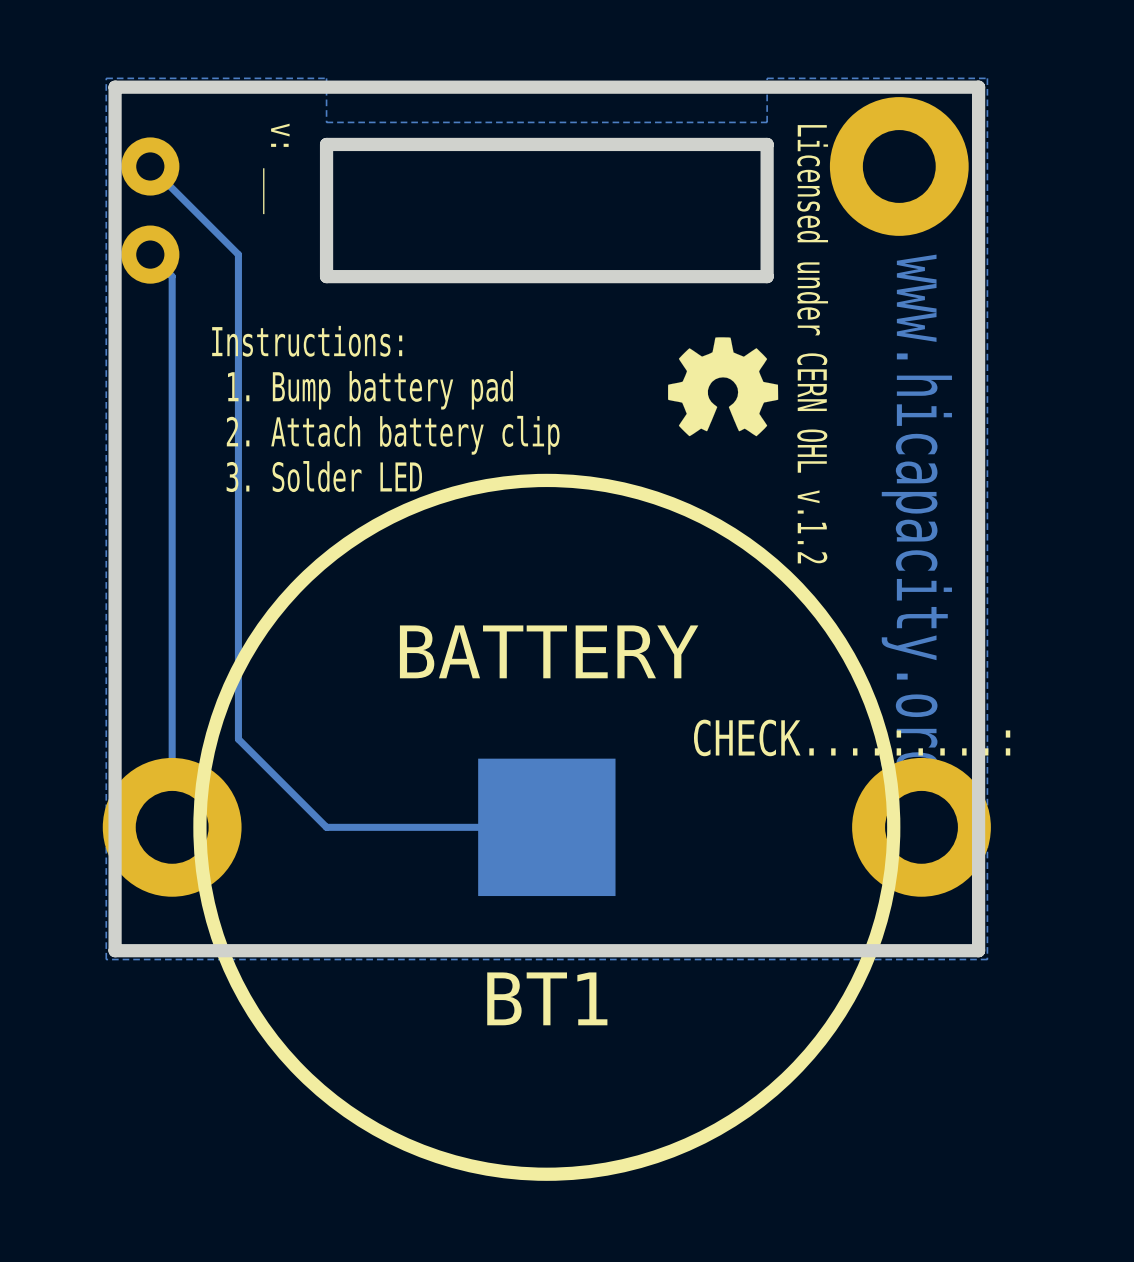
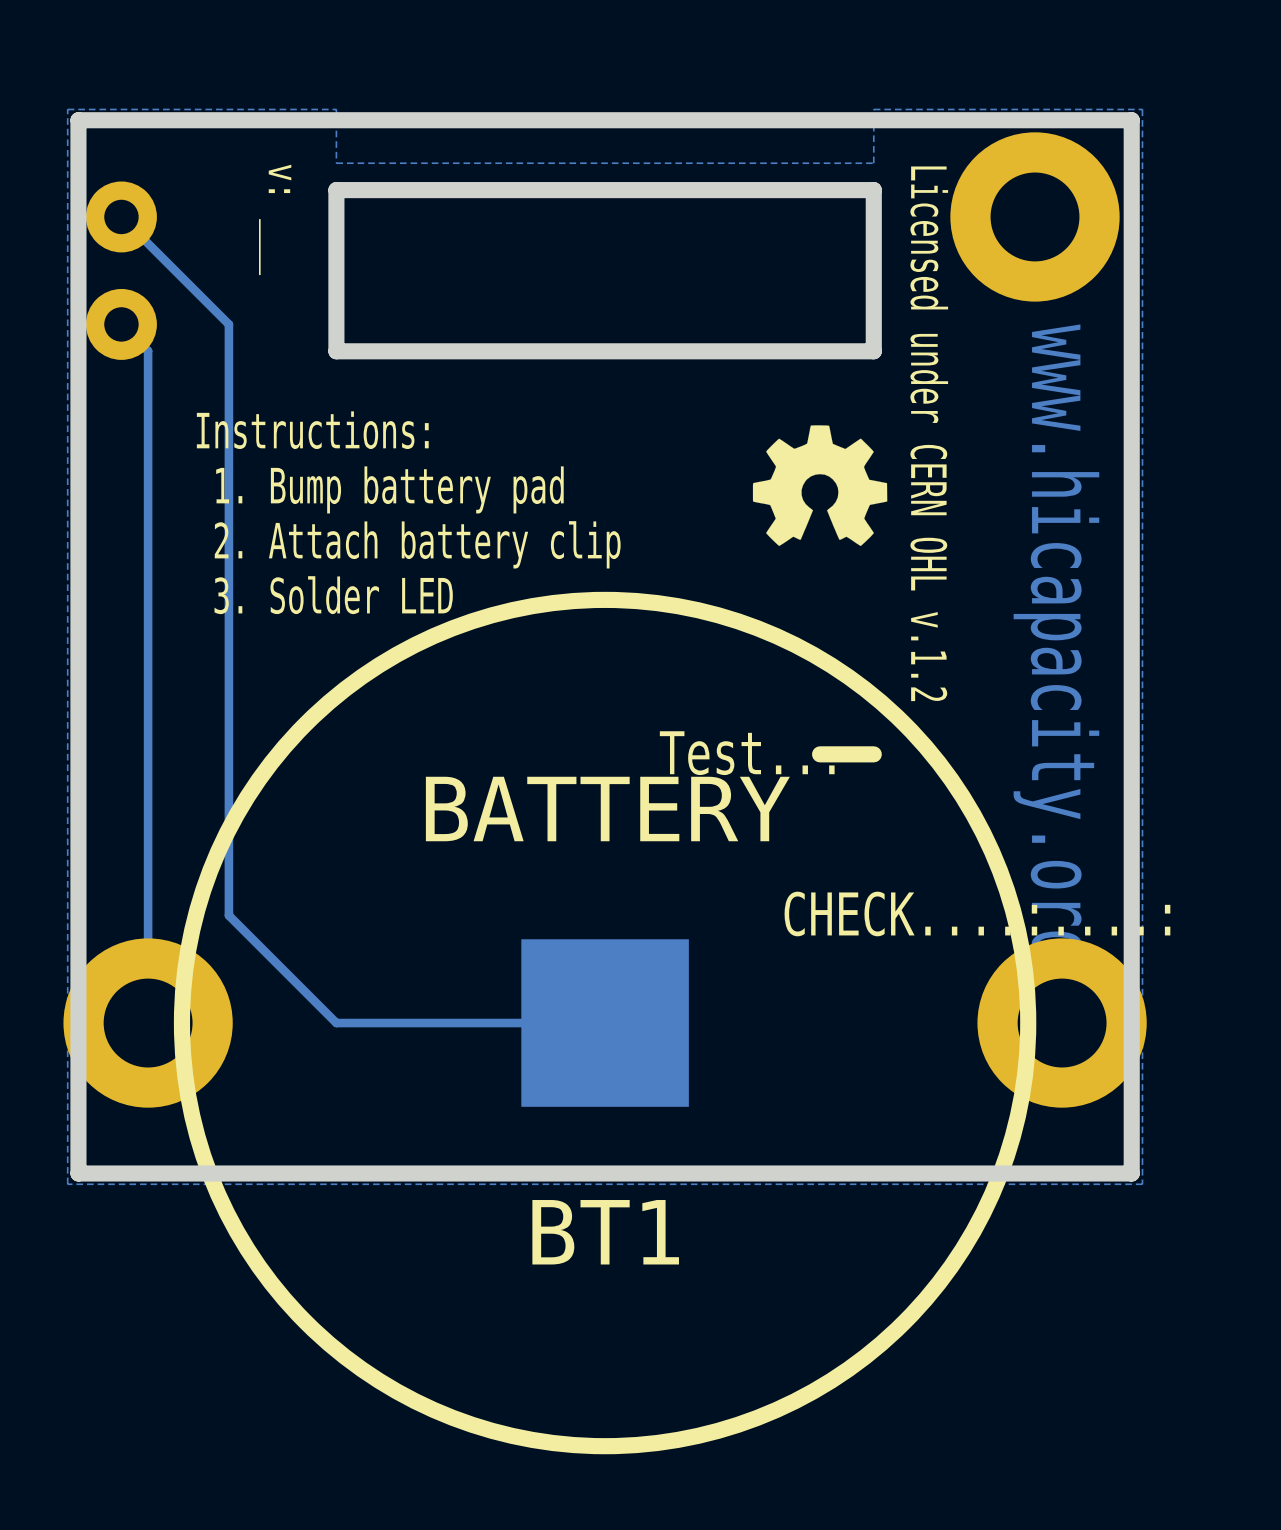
text: none -> Test... (747, 753)
line: none -> (873, 754) (820, 754)

